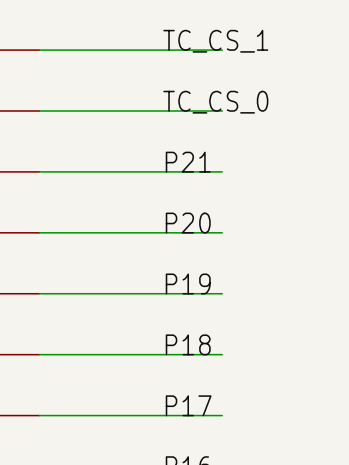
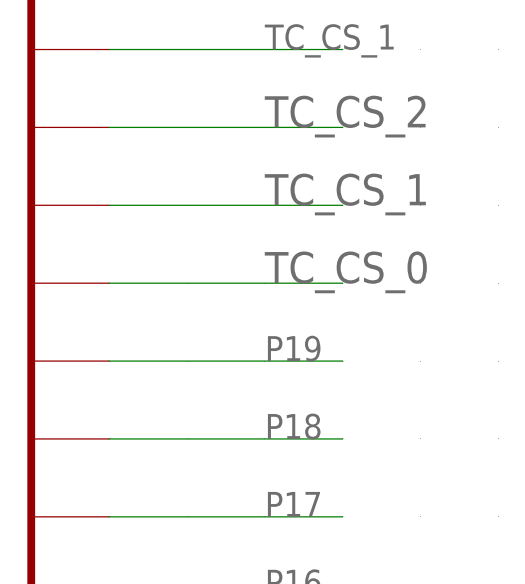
label: TC_CS_0 (215, 102) -> TC_CS_2 (345, 116)
label: P21 (188, 162) -> TC_CS_1 (345, 194)
label: P20 (188, 223) -> TC_CS_0 (345, 272)

